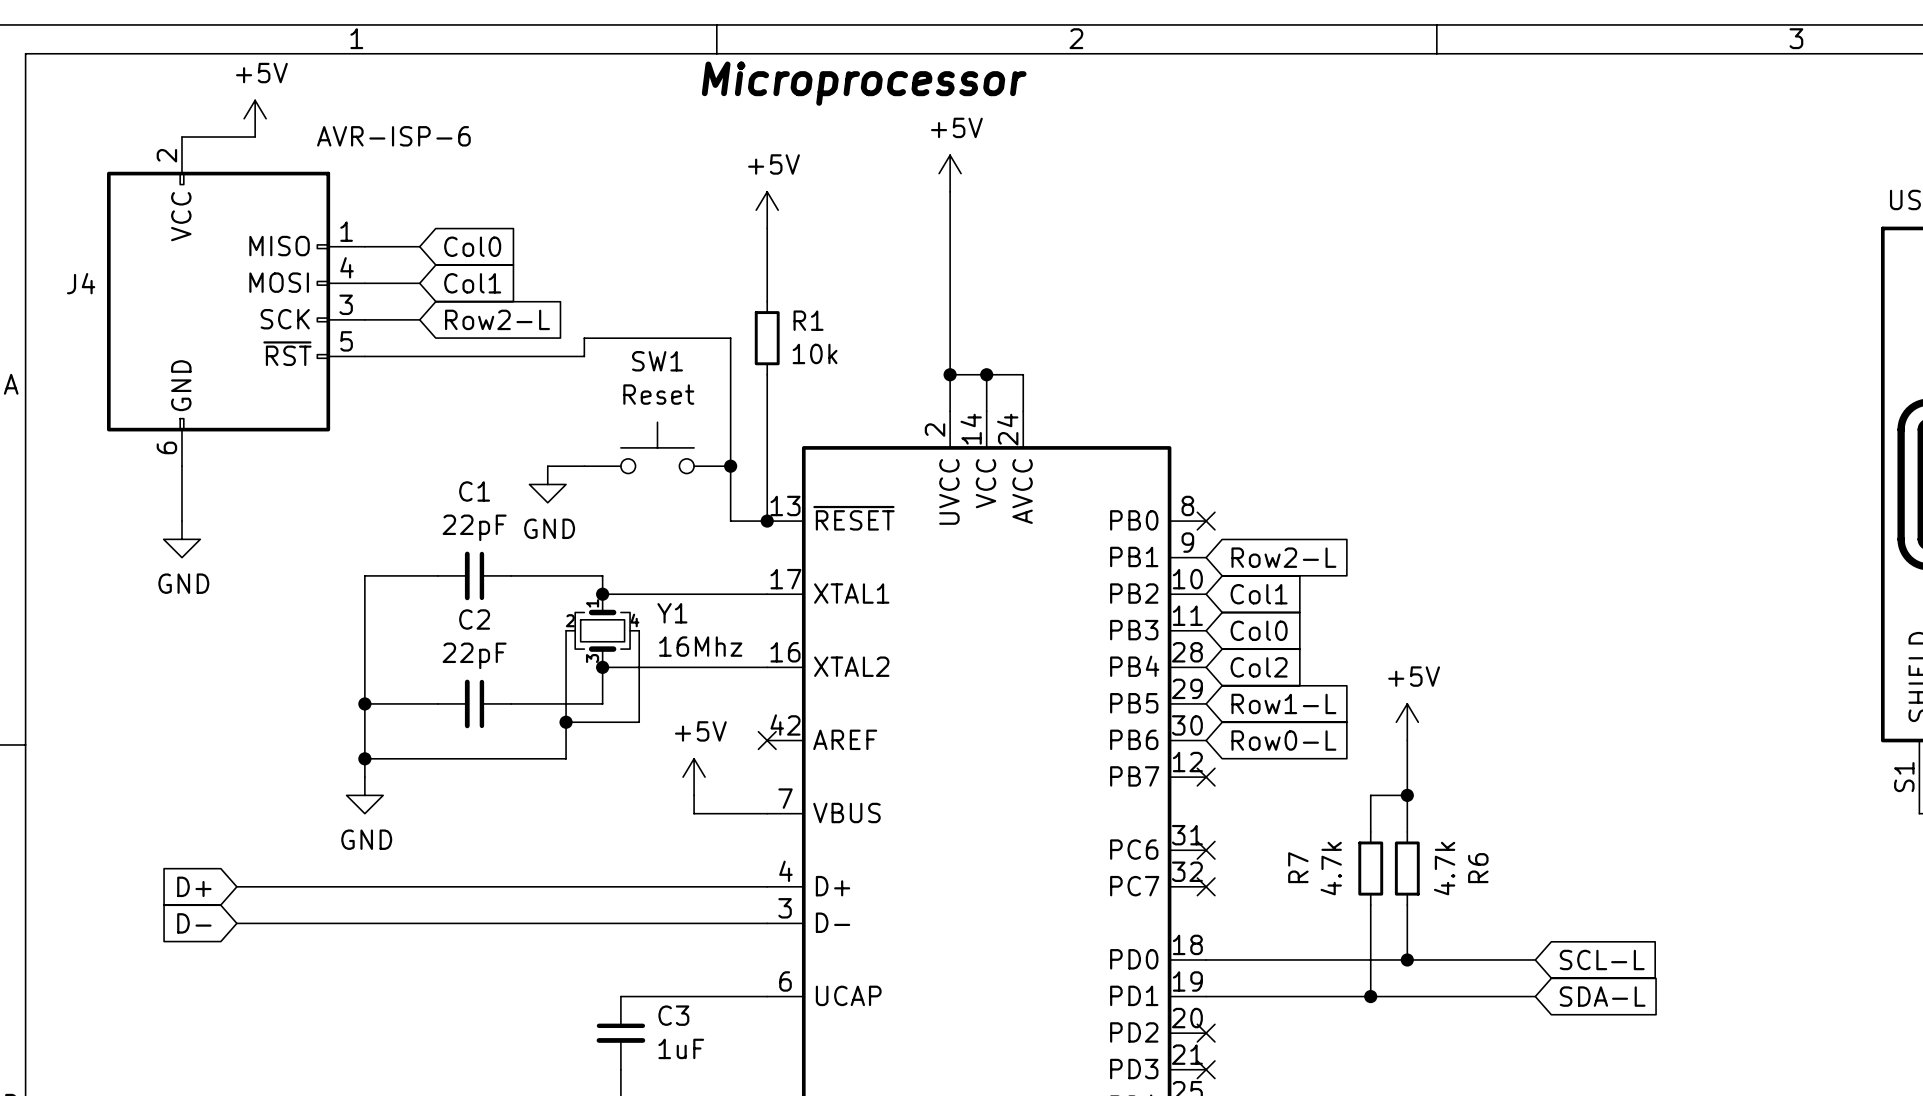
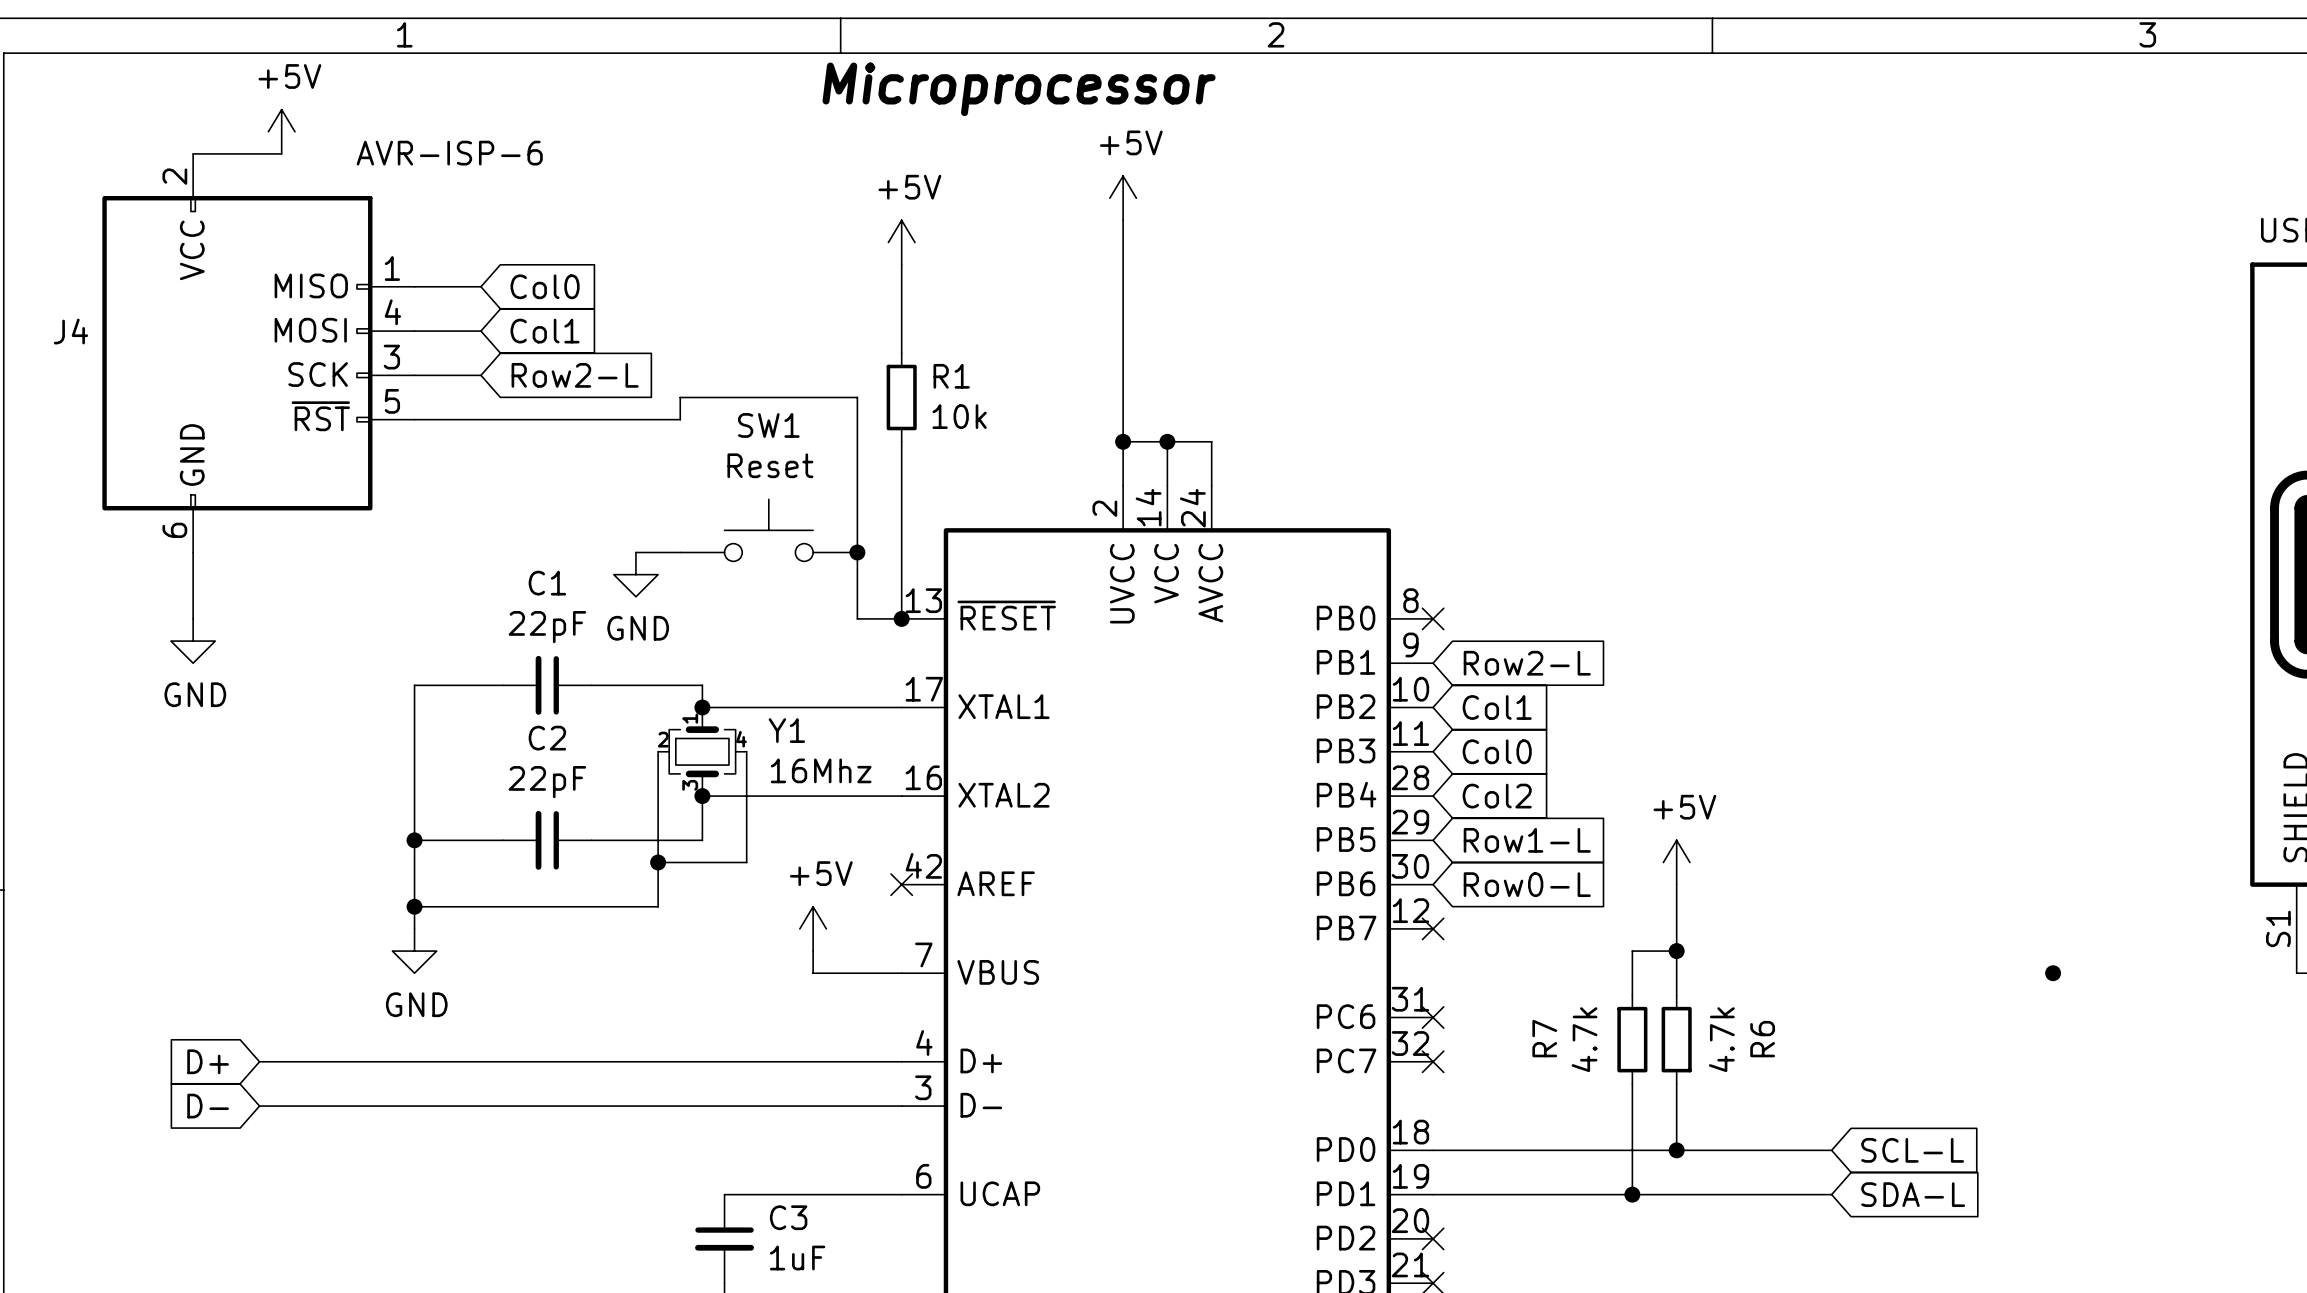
junction: none -> (2053, 973)

